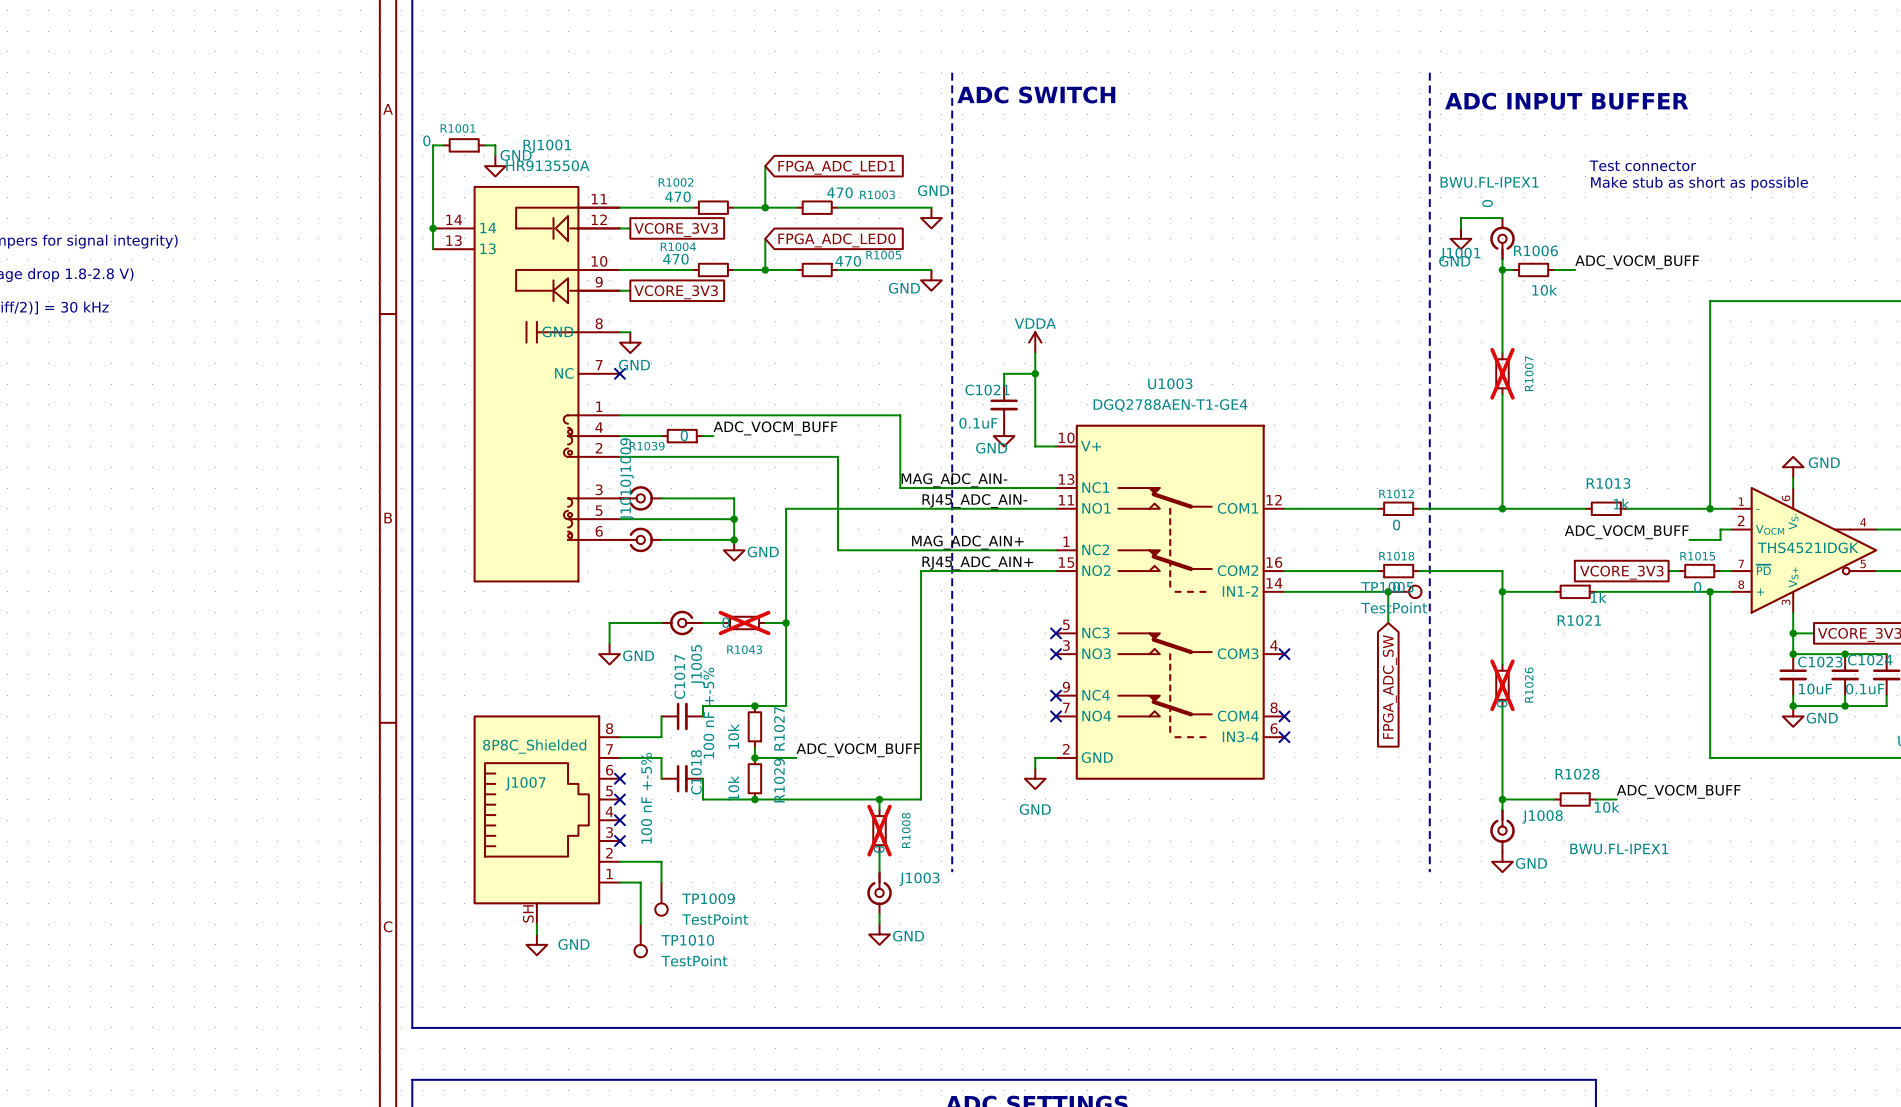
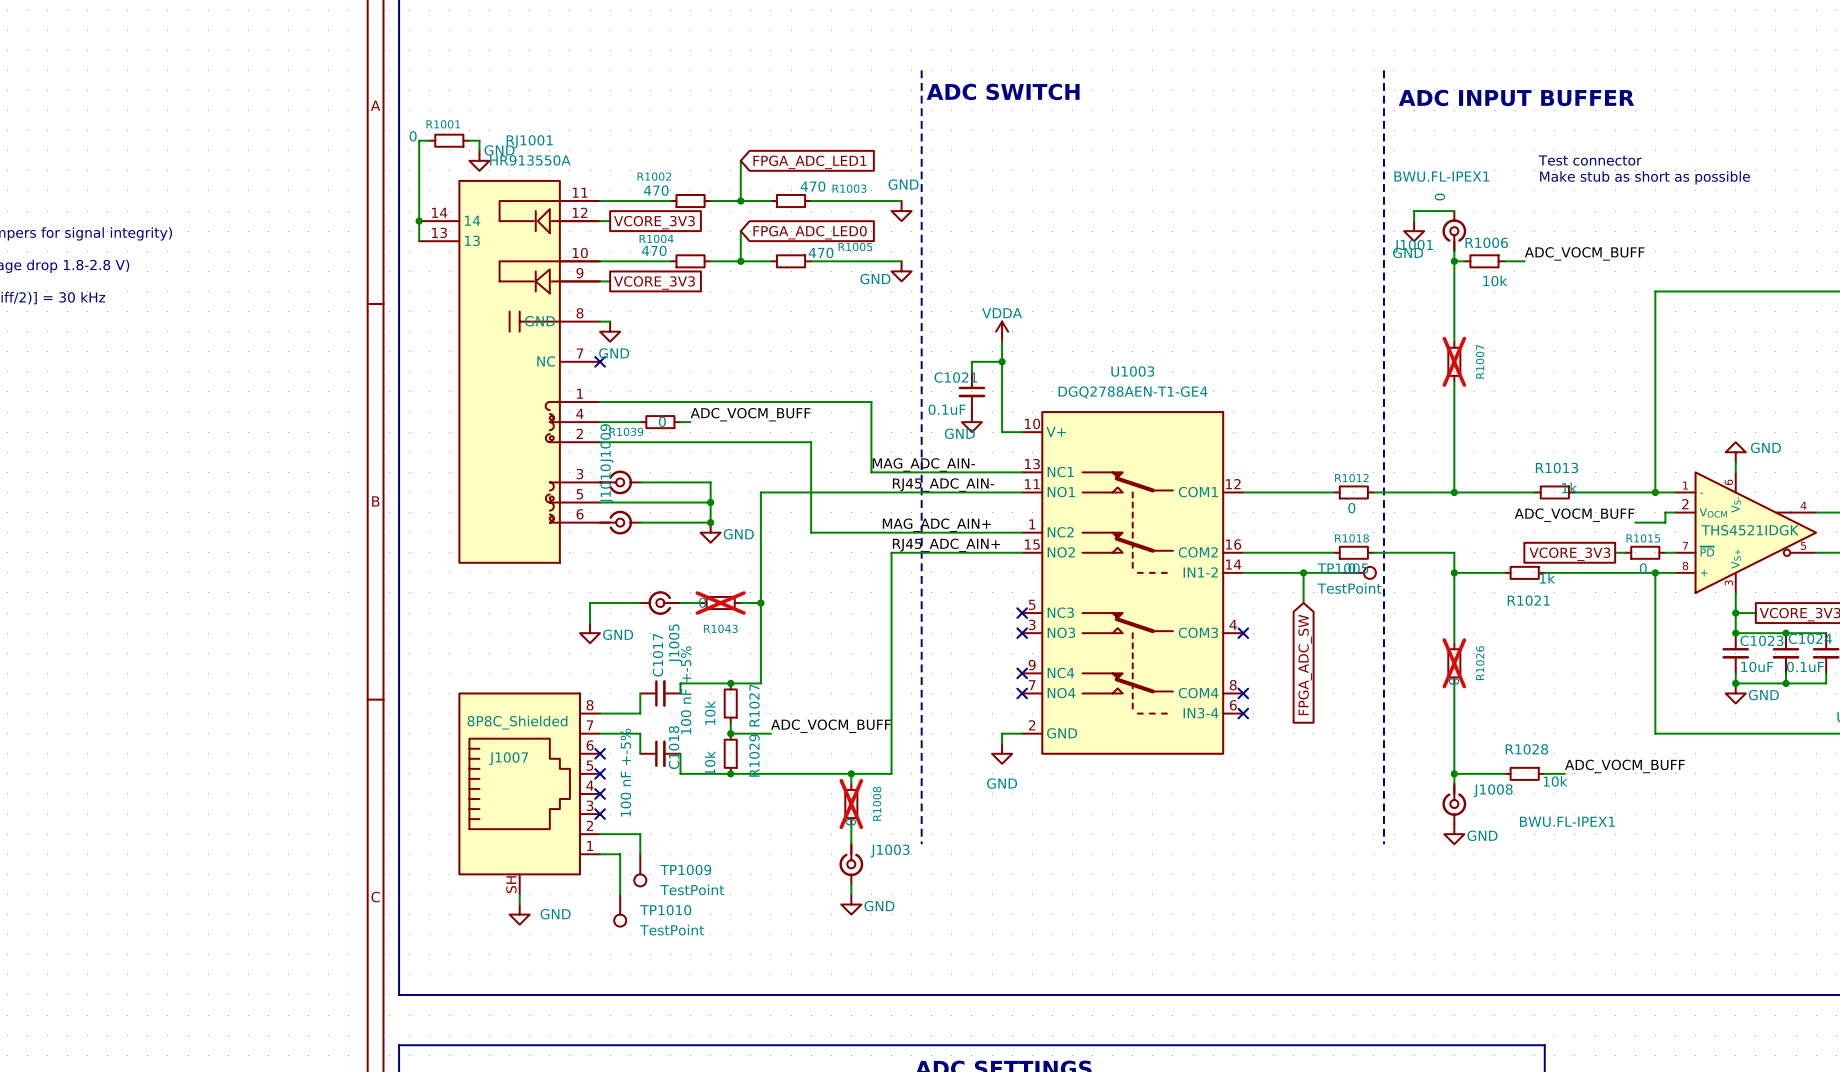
wire: (1388, 591) (1388, 622) -> (1303, 572) (1303, 603)
junction position: (1388, 591) -> (1303, 572)
global label position: FPGA_ADC_SW (1389, 686) -> FPGA_ADC_SW (1305, 664)

